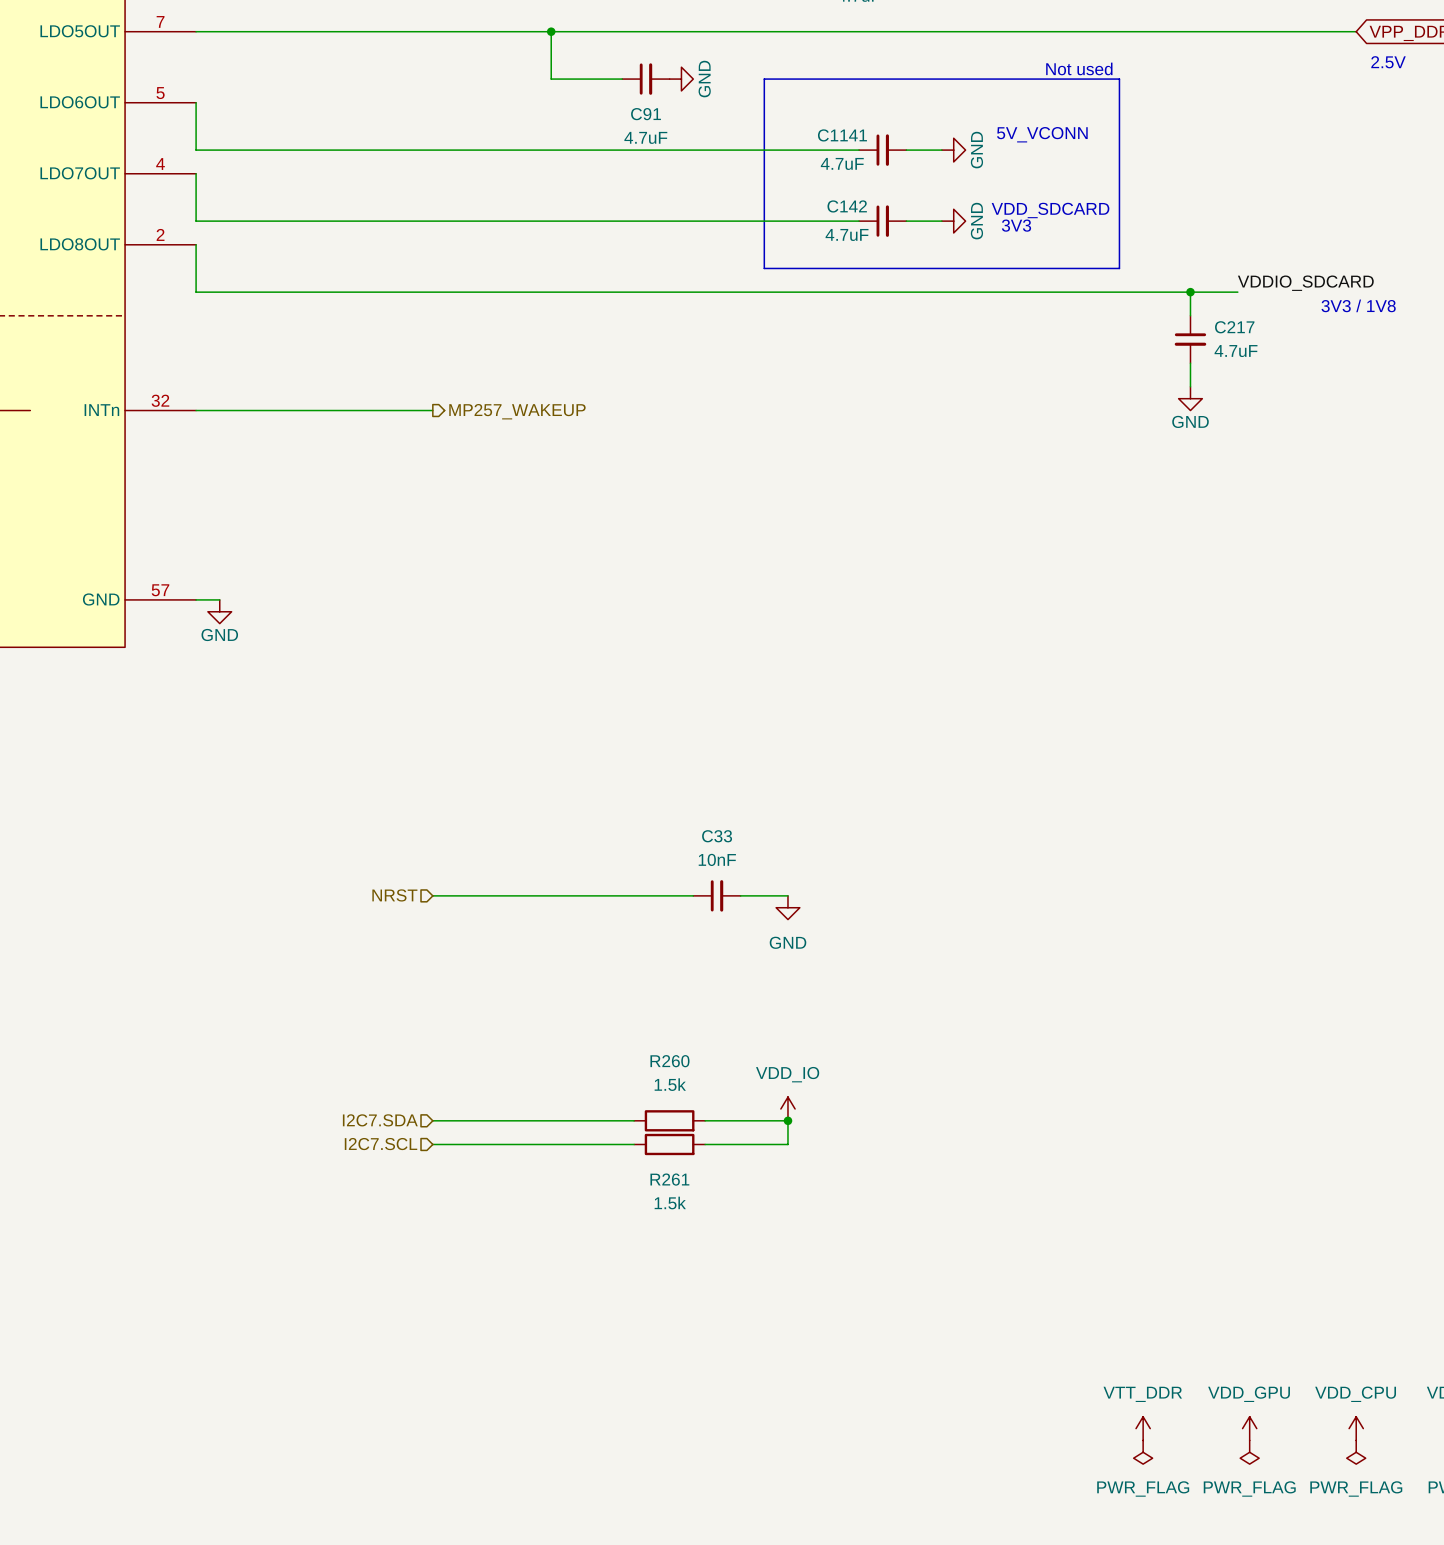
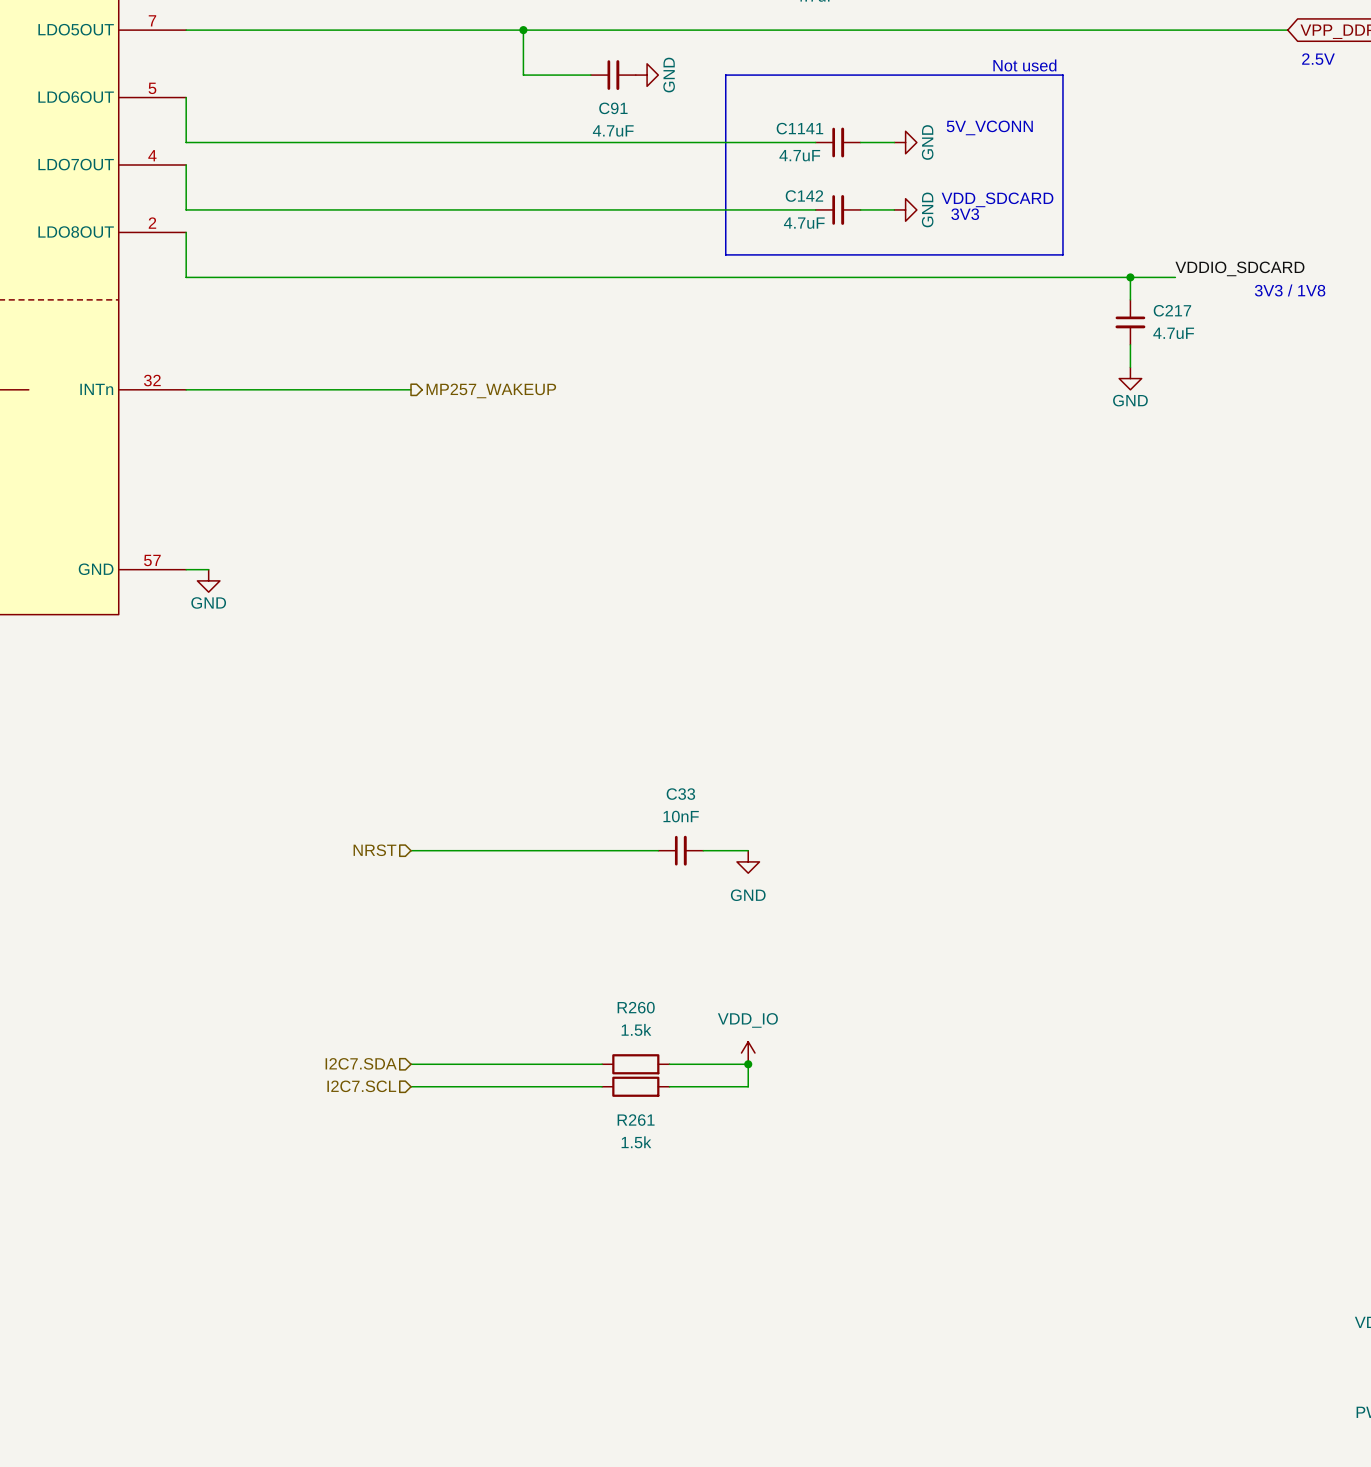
power symbol: VTT_DDR (1143, 1428) -> none
power symbol: VDD_GPU (1249, 1428) -> none
power symbol: VDD_CPU (1356, 1428) -> none
power symbol: PWR_FLAG (1143, 1452) -> none
power symbol: PWR_FLAG (1249, 1452) -> none
power symbol: PWR_FLAG (1356, 1452) -> none

